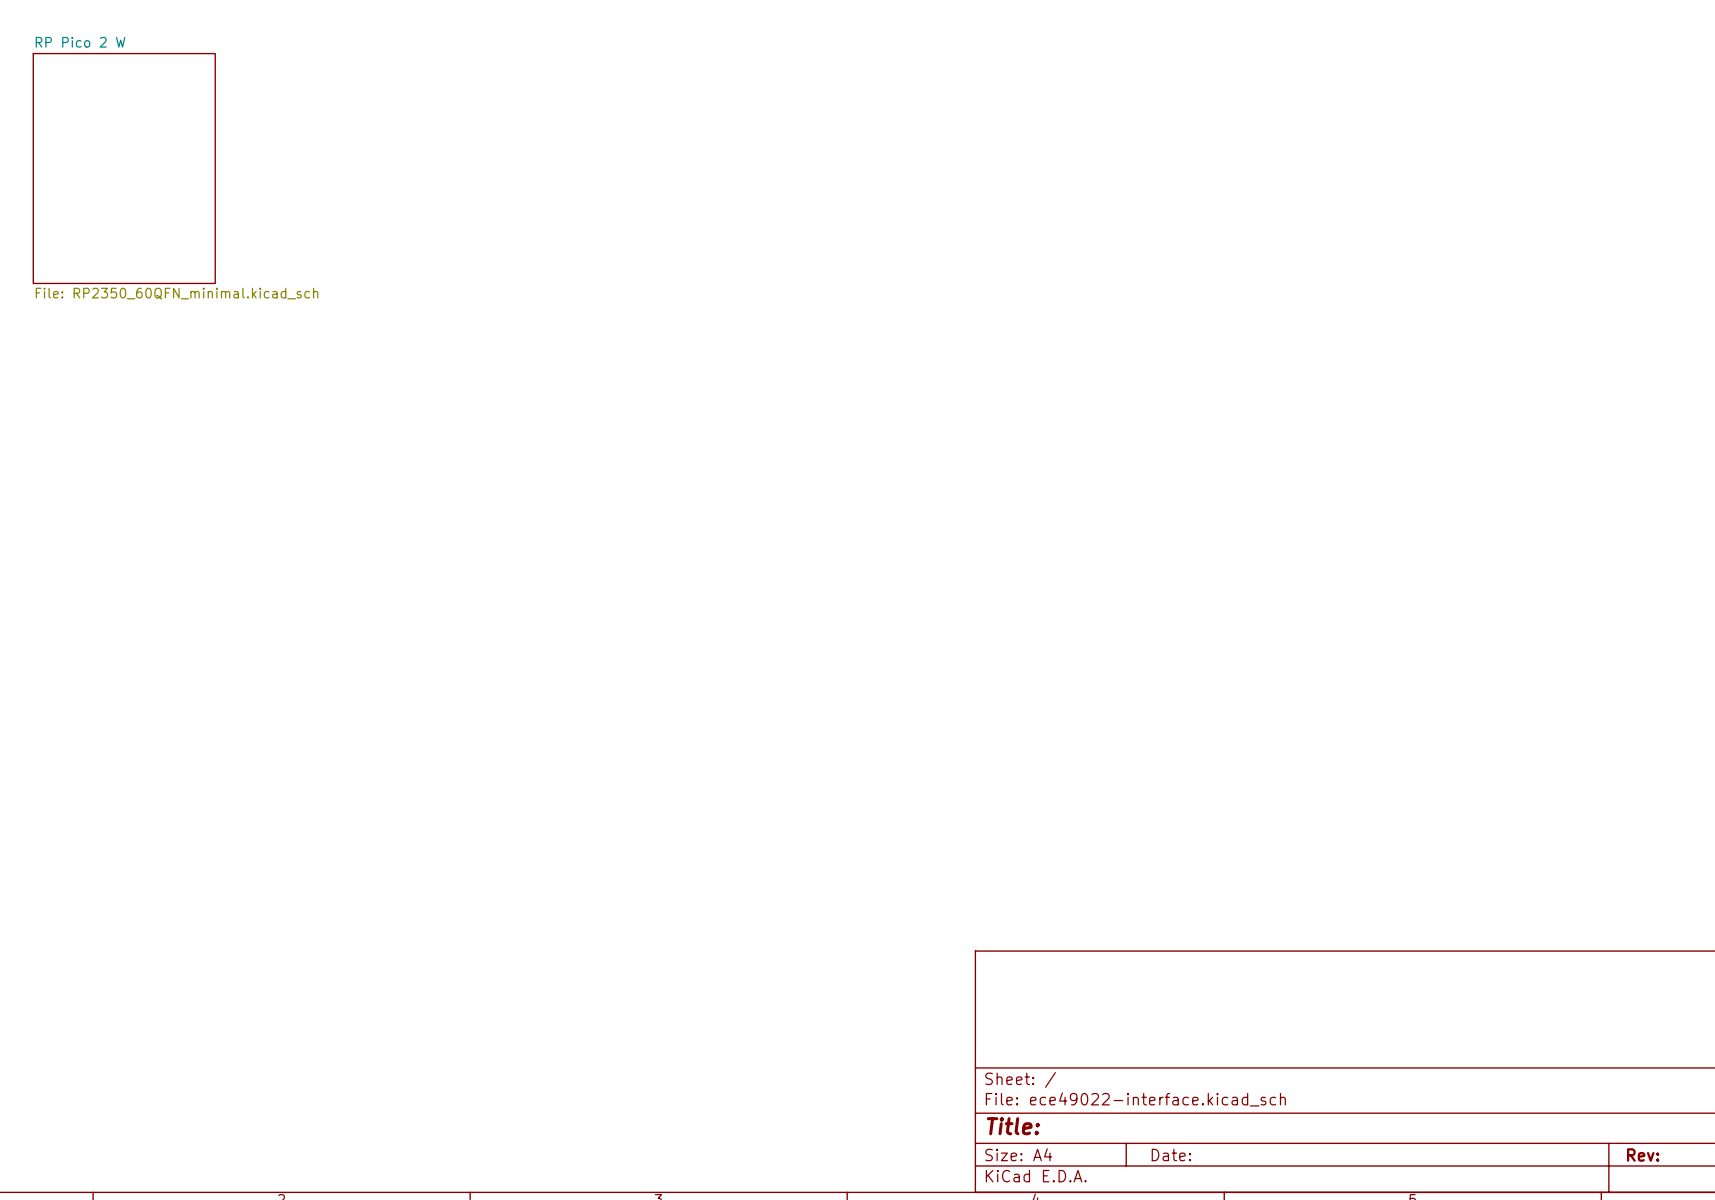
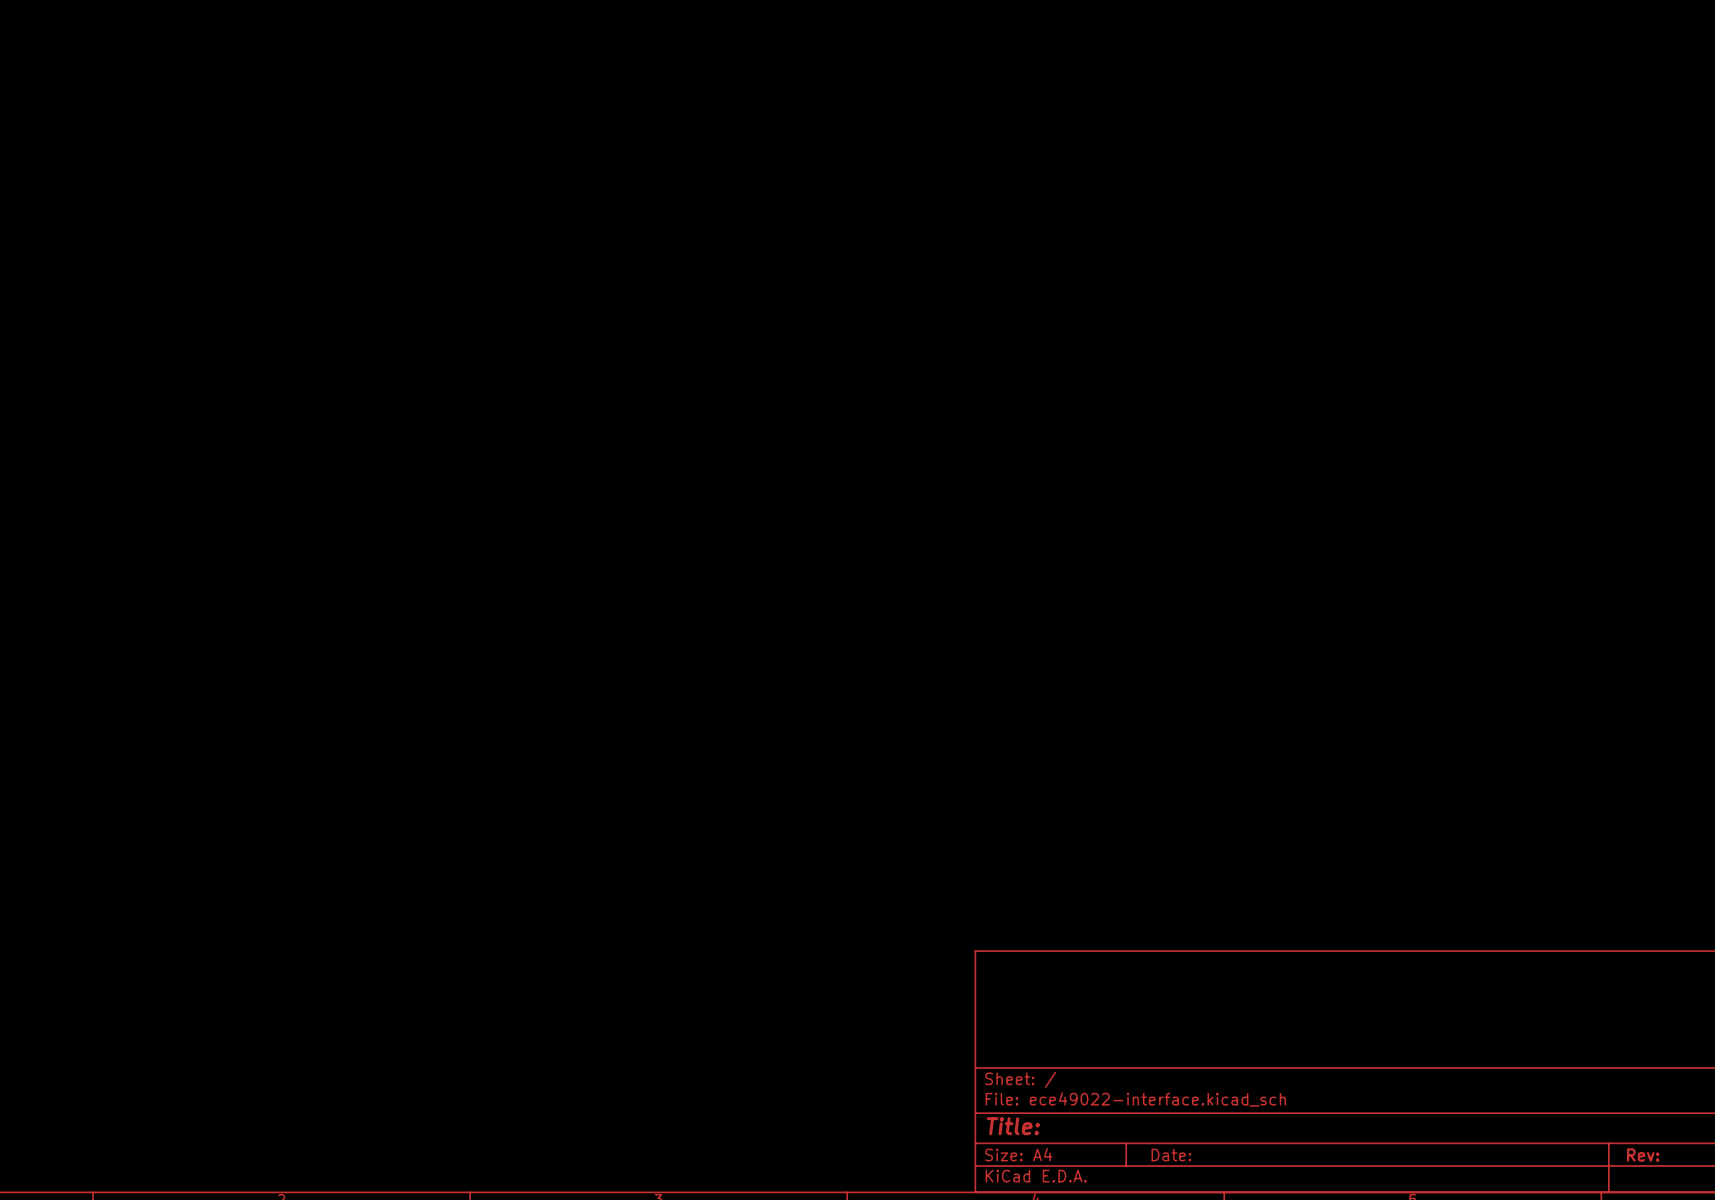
sheet RP Pico 2 W: File: RP2350_60QFN_minimal.kicad_sch (124, 168) -> none

